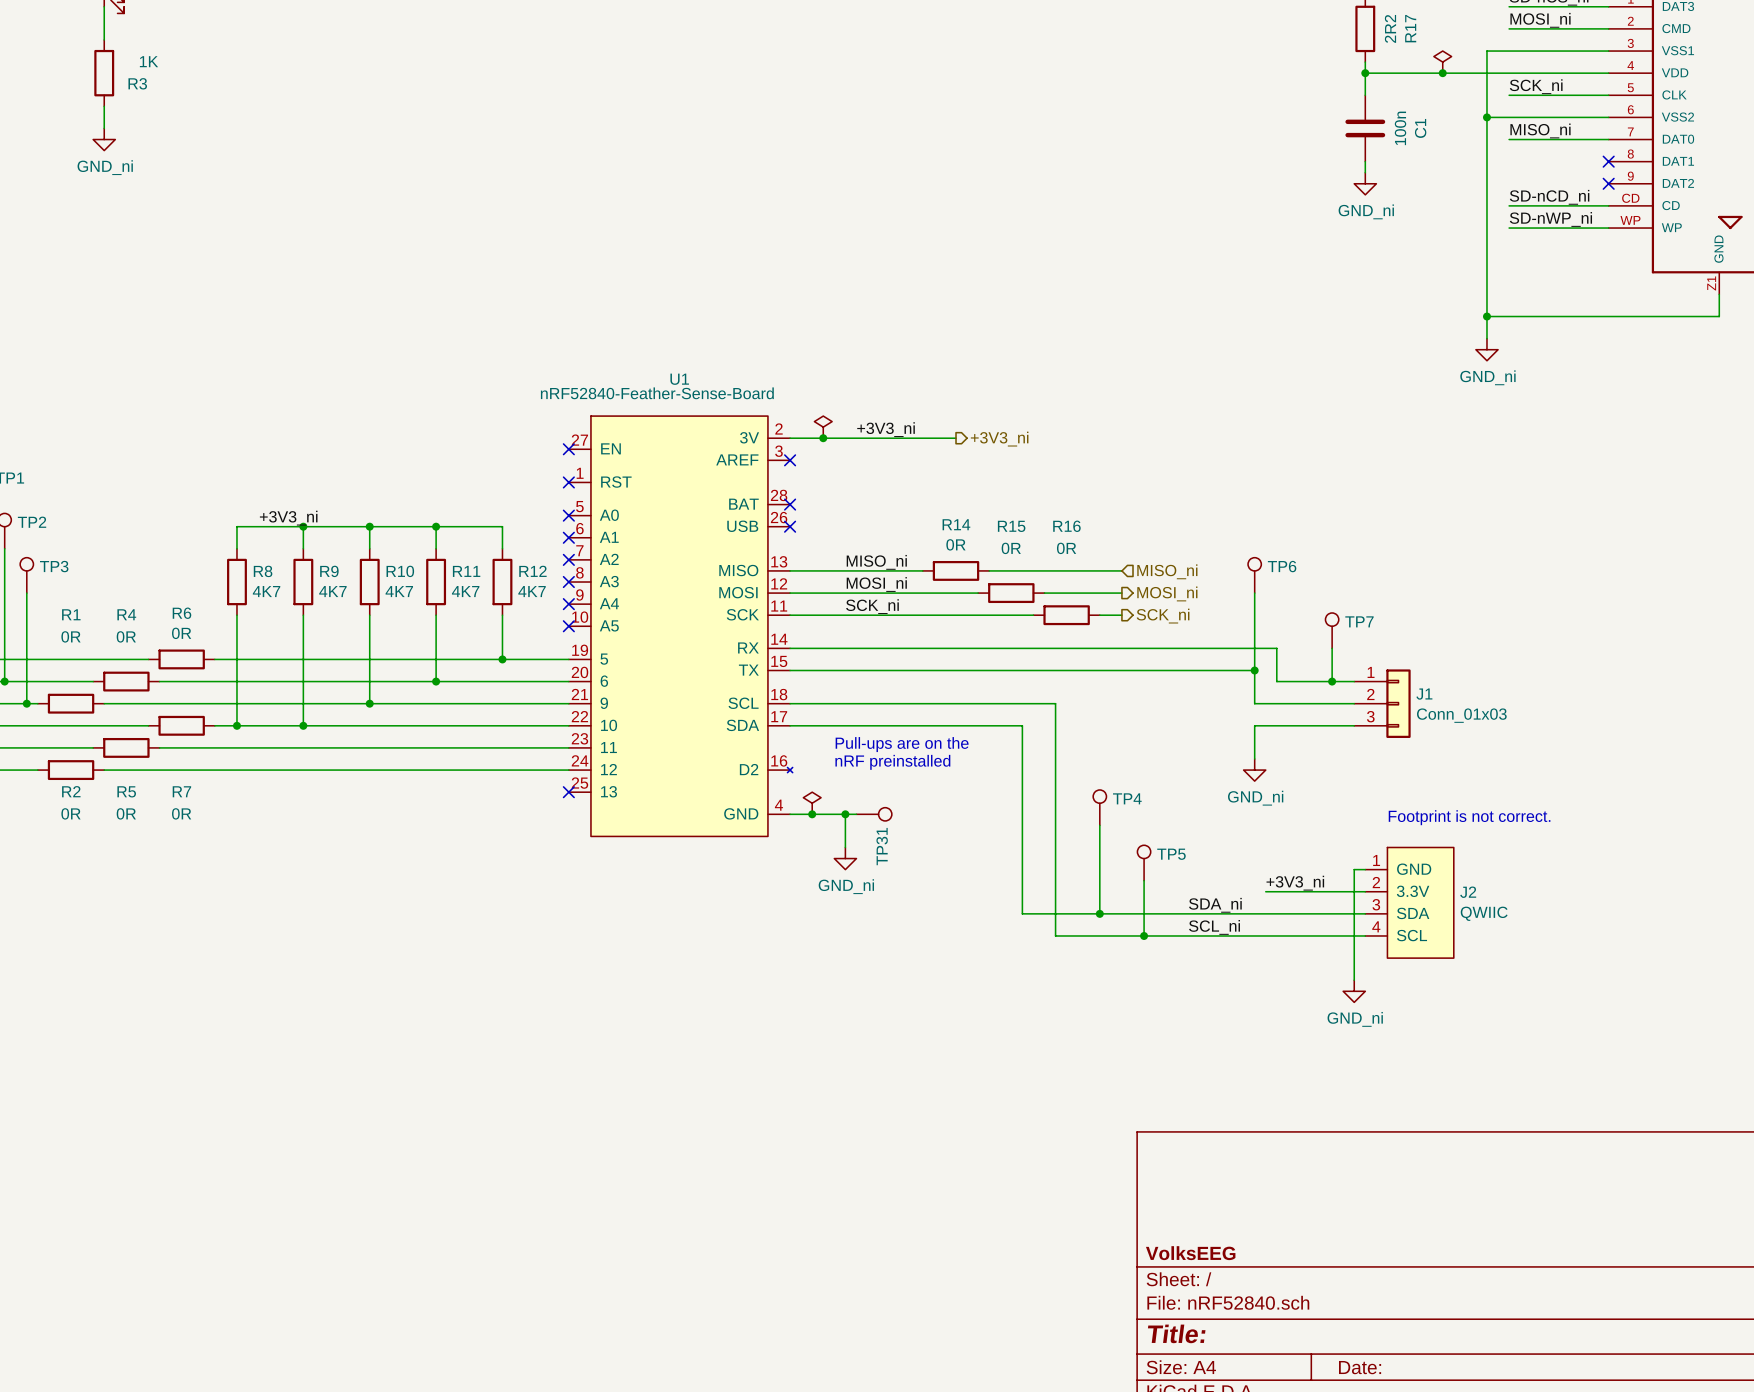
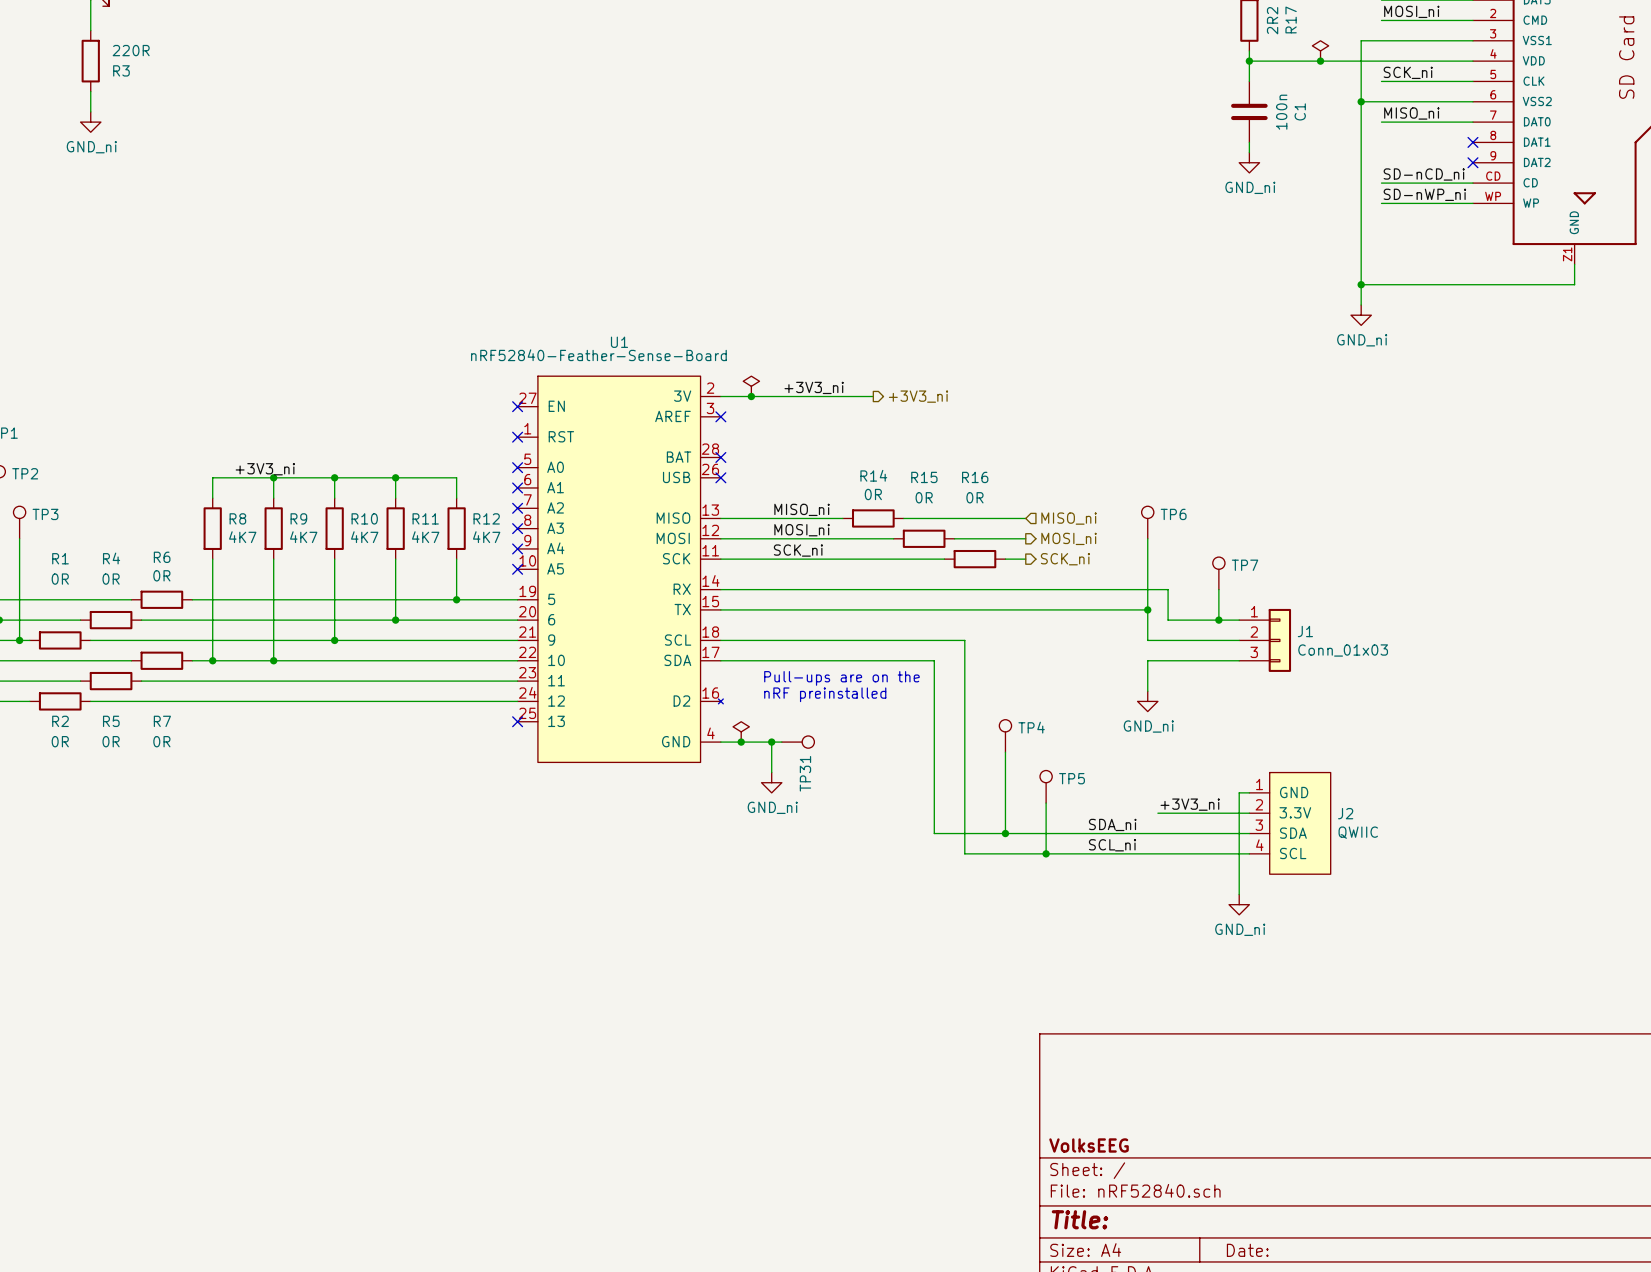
R3 value: 1K (149, 61) -> 220R (131, 50)
text: Footprint is not correct. (1469, 817) -> none

